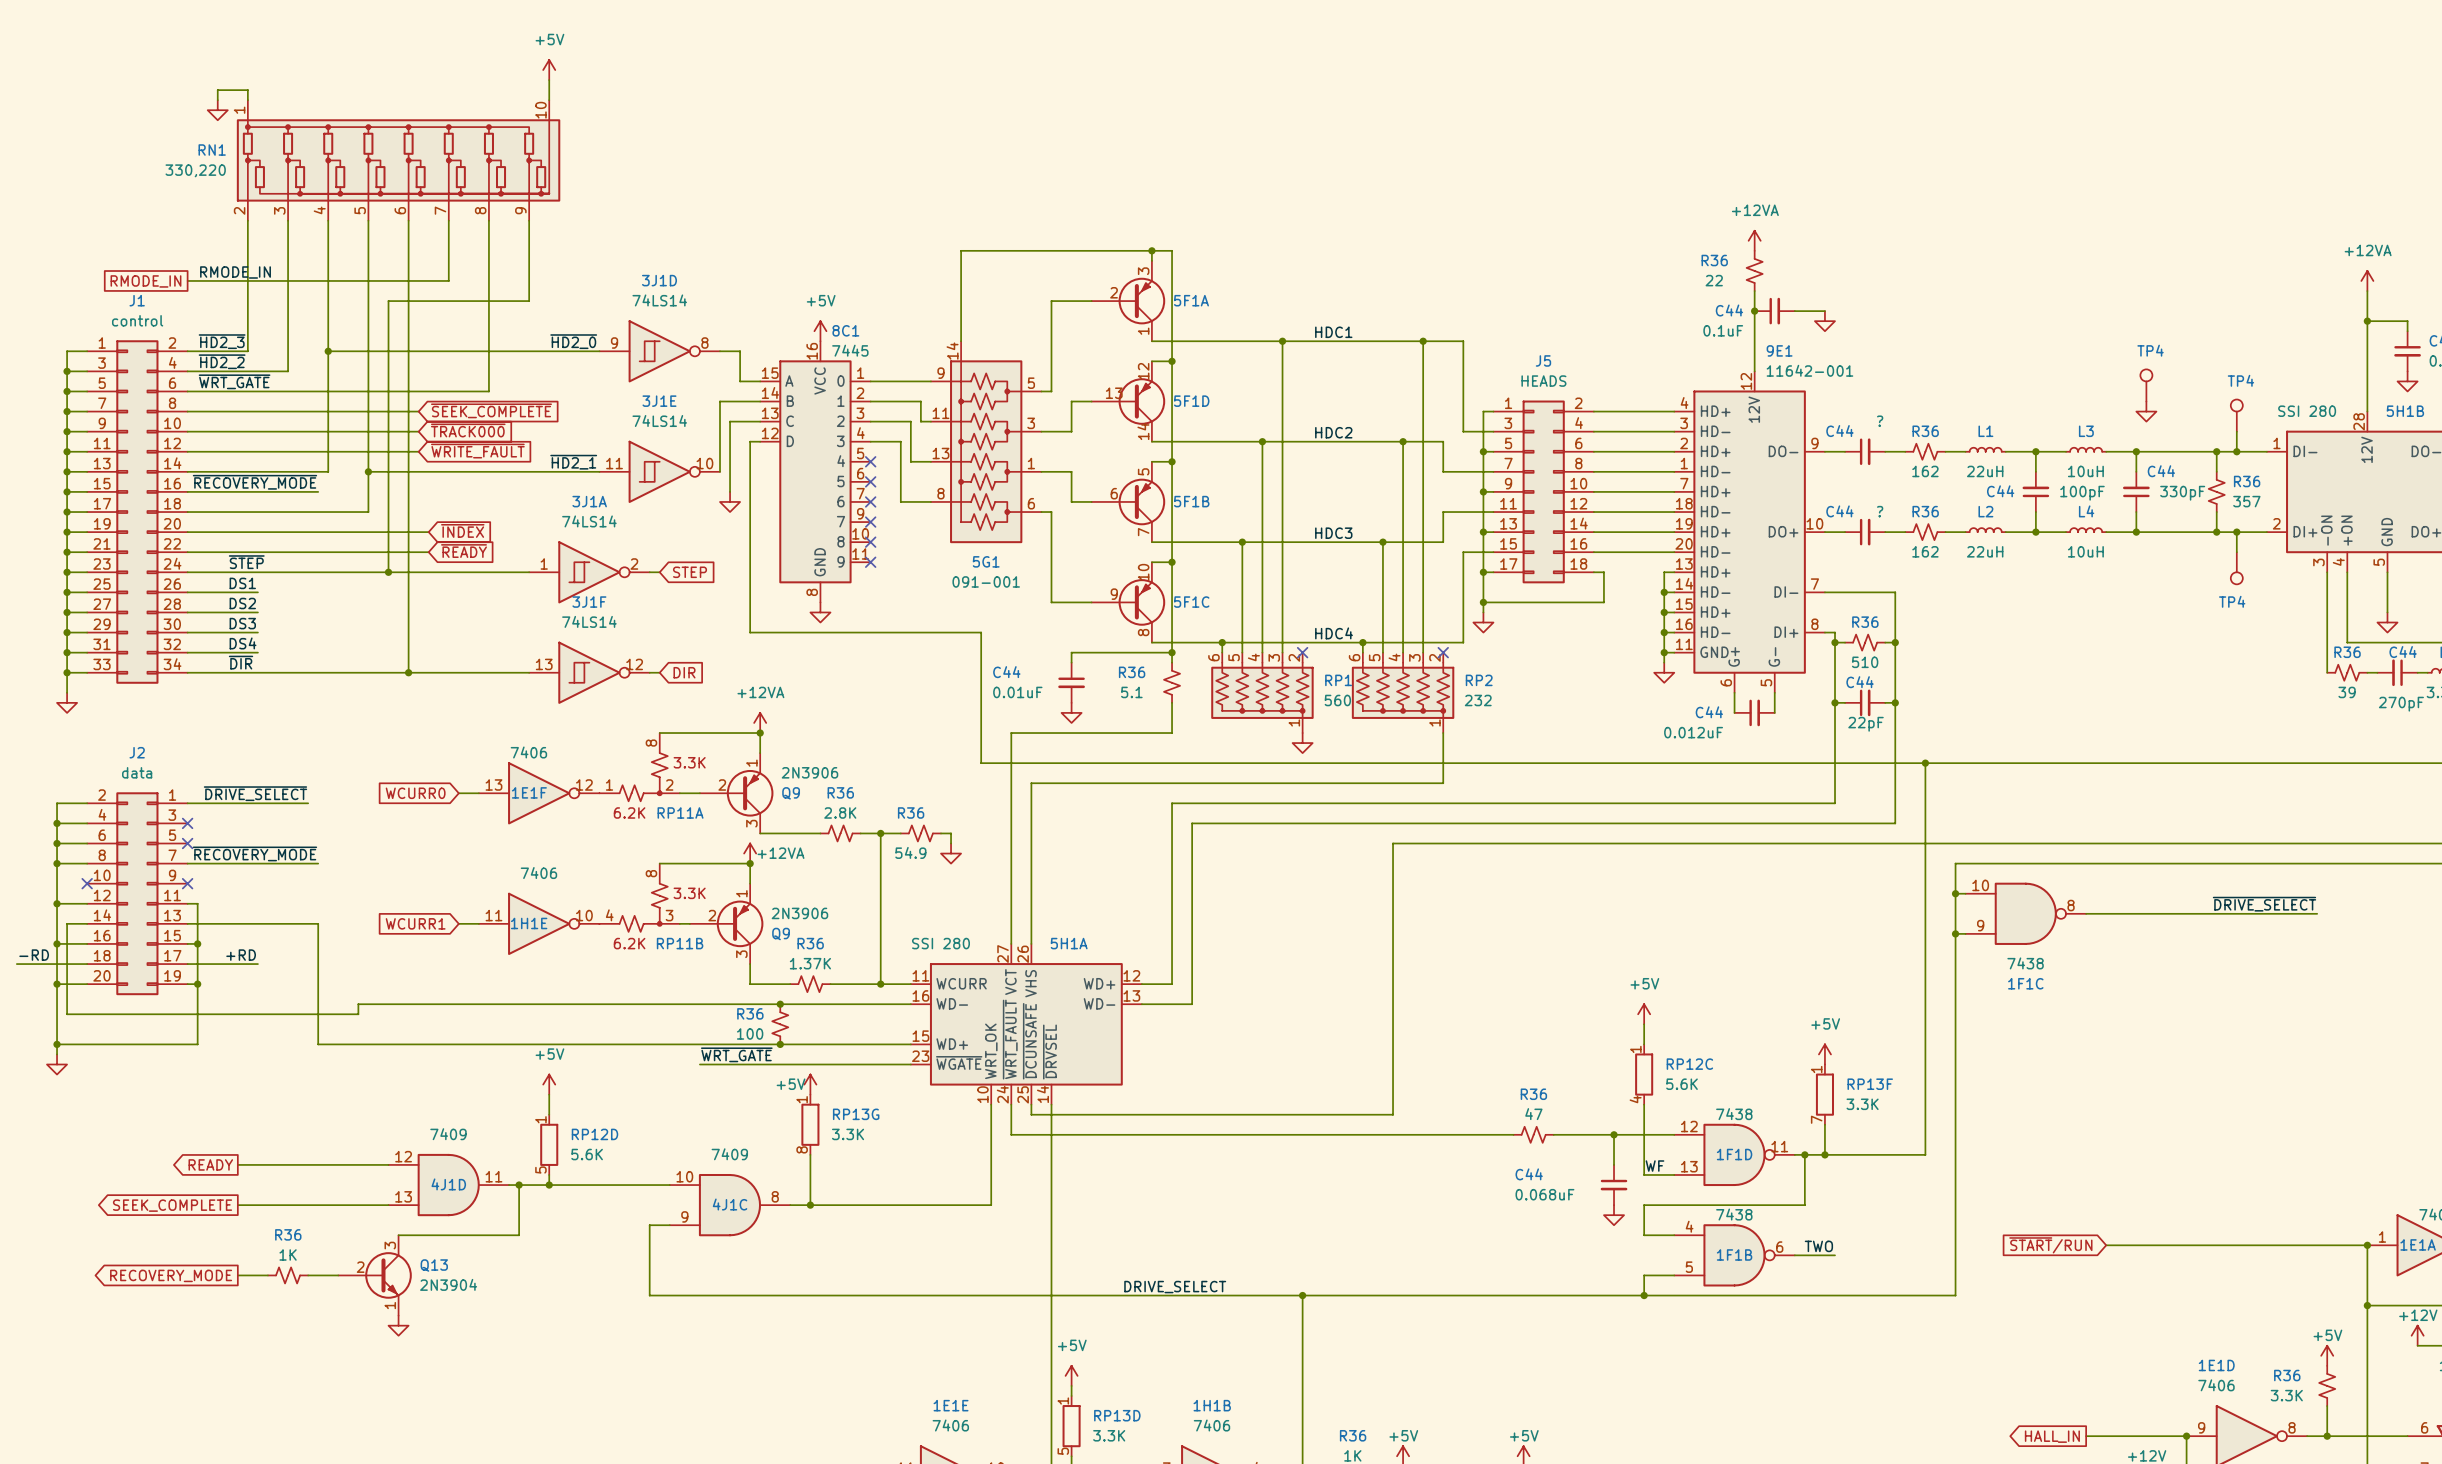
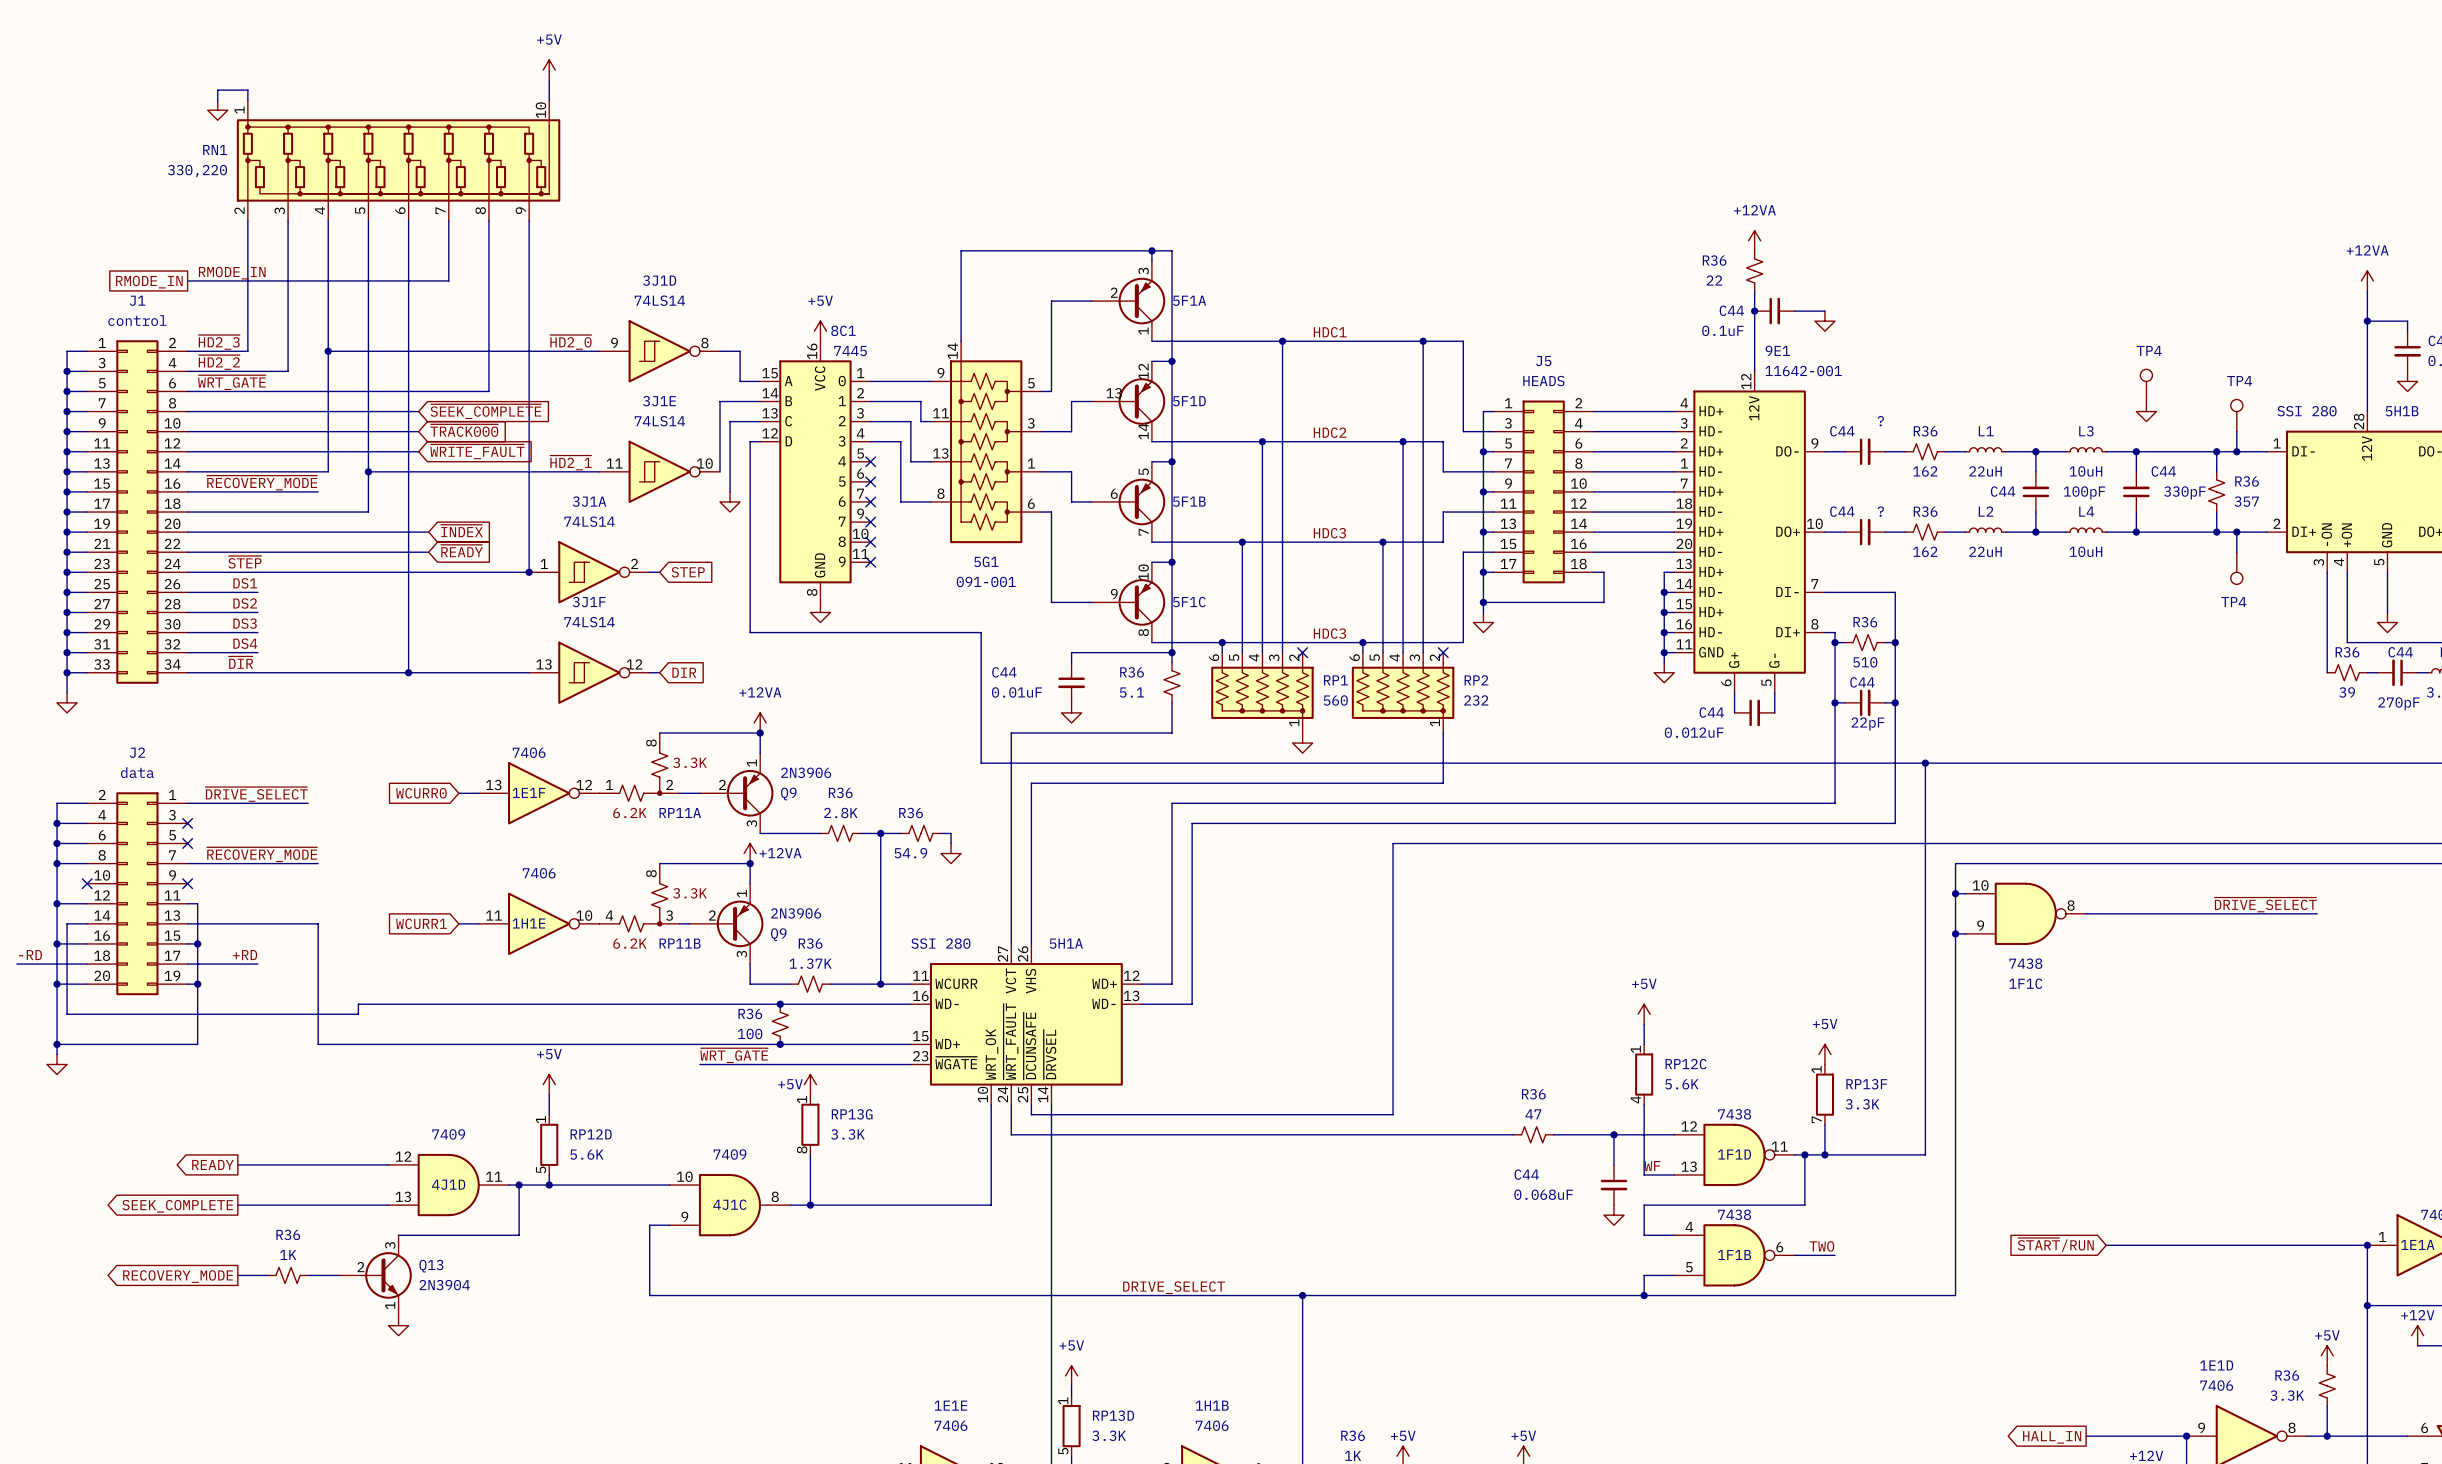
wire: (529, 301) (388, 301) (388, 572) -> (529, 301) (529, 572)
junction: (388, 572) -> none
junction: none -> (529, 572)
label: HDC4 (1334, 633) -> HDC3 (1329, 633)

